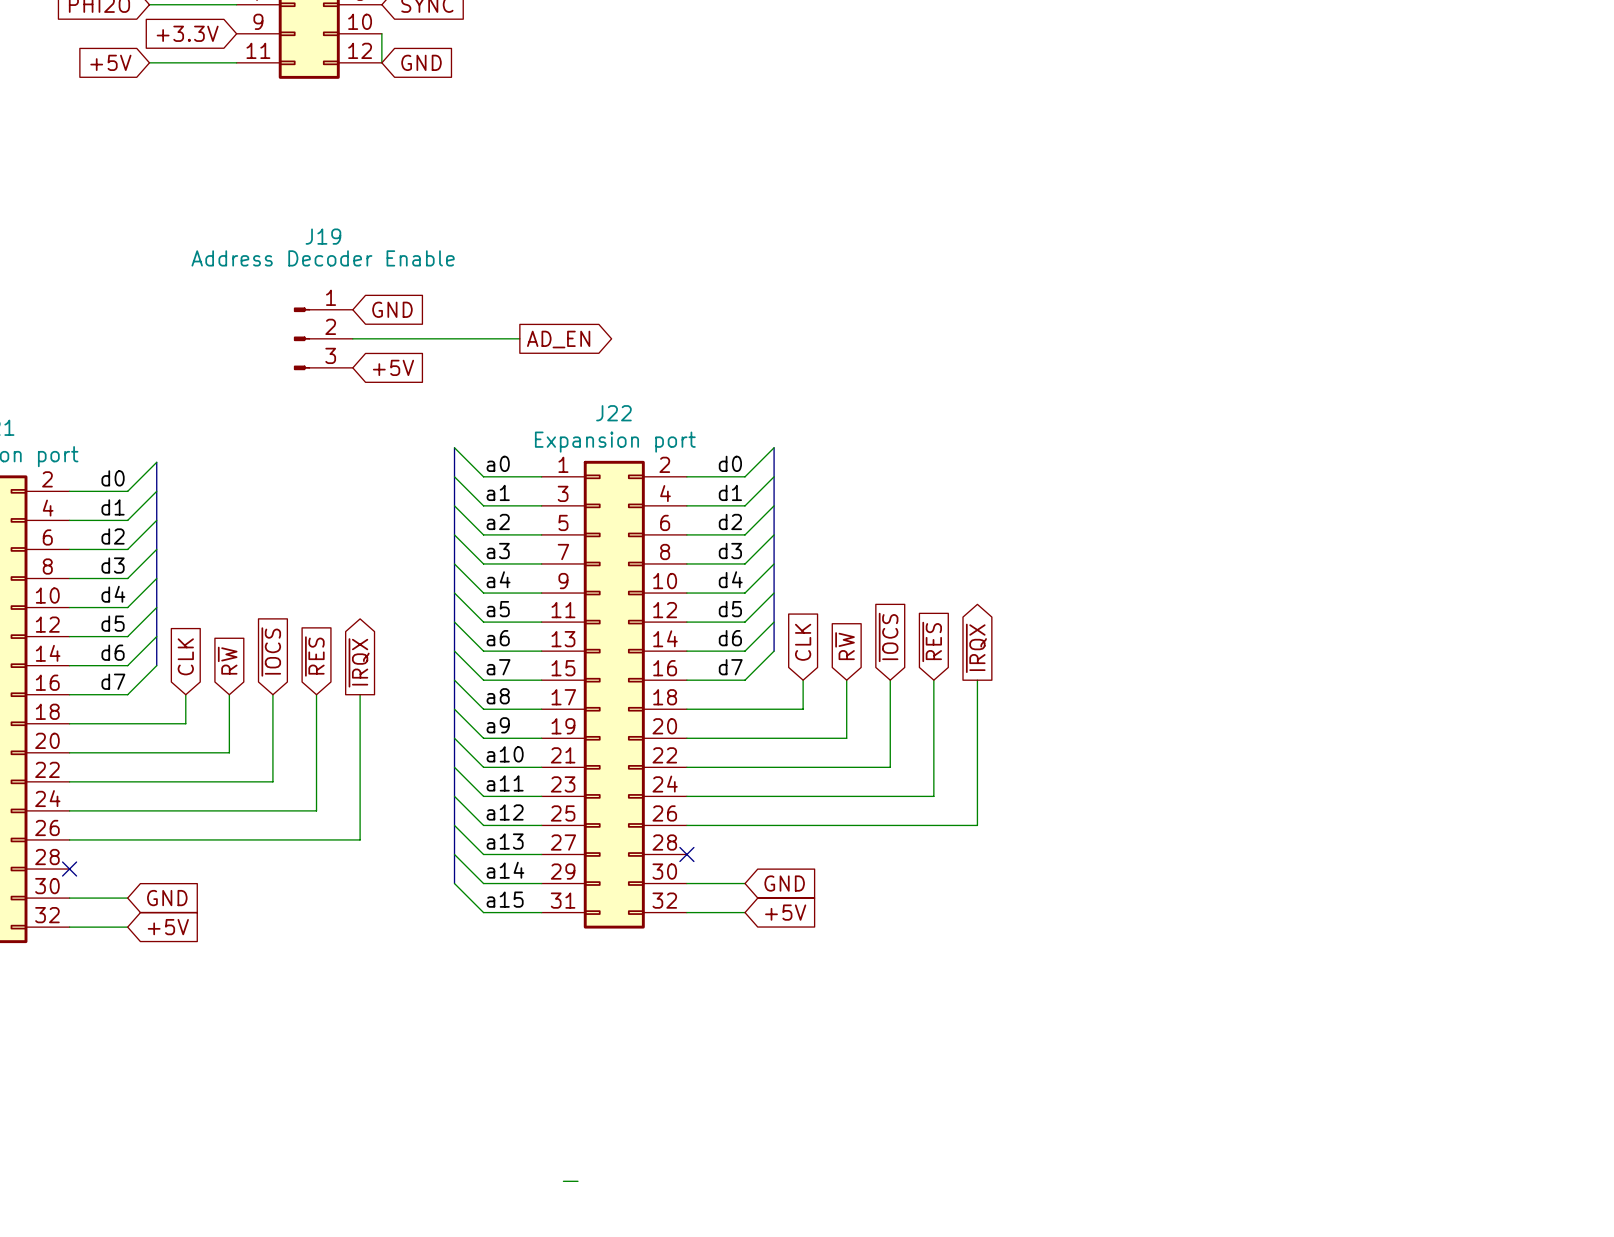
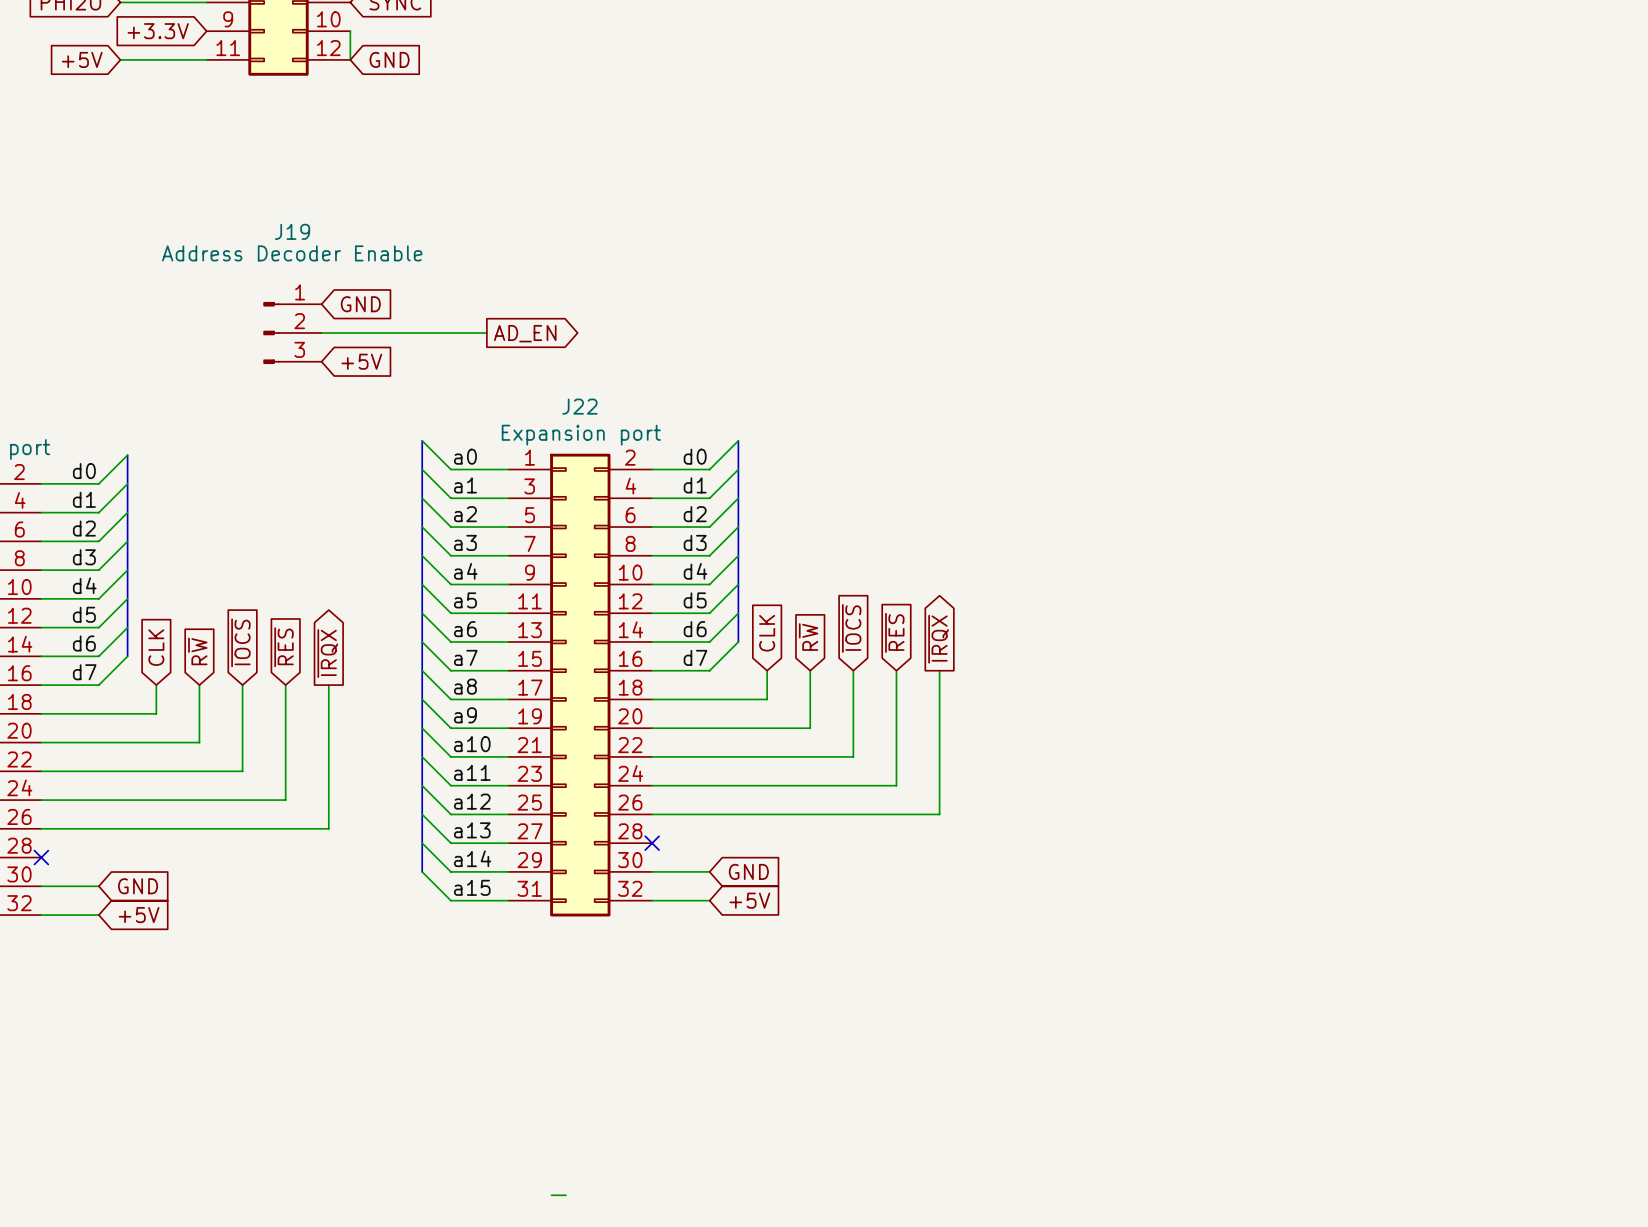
wire: (563, 1181) (577, 1181) -> (551, 1195) (565, 1195)

